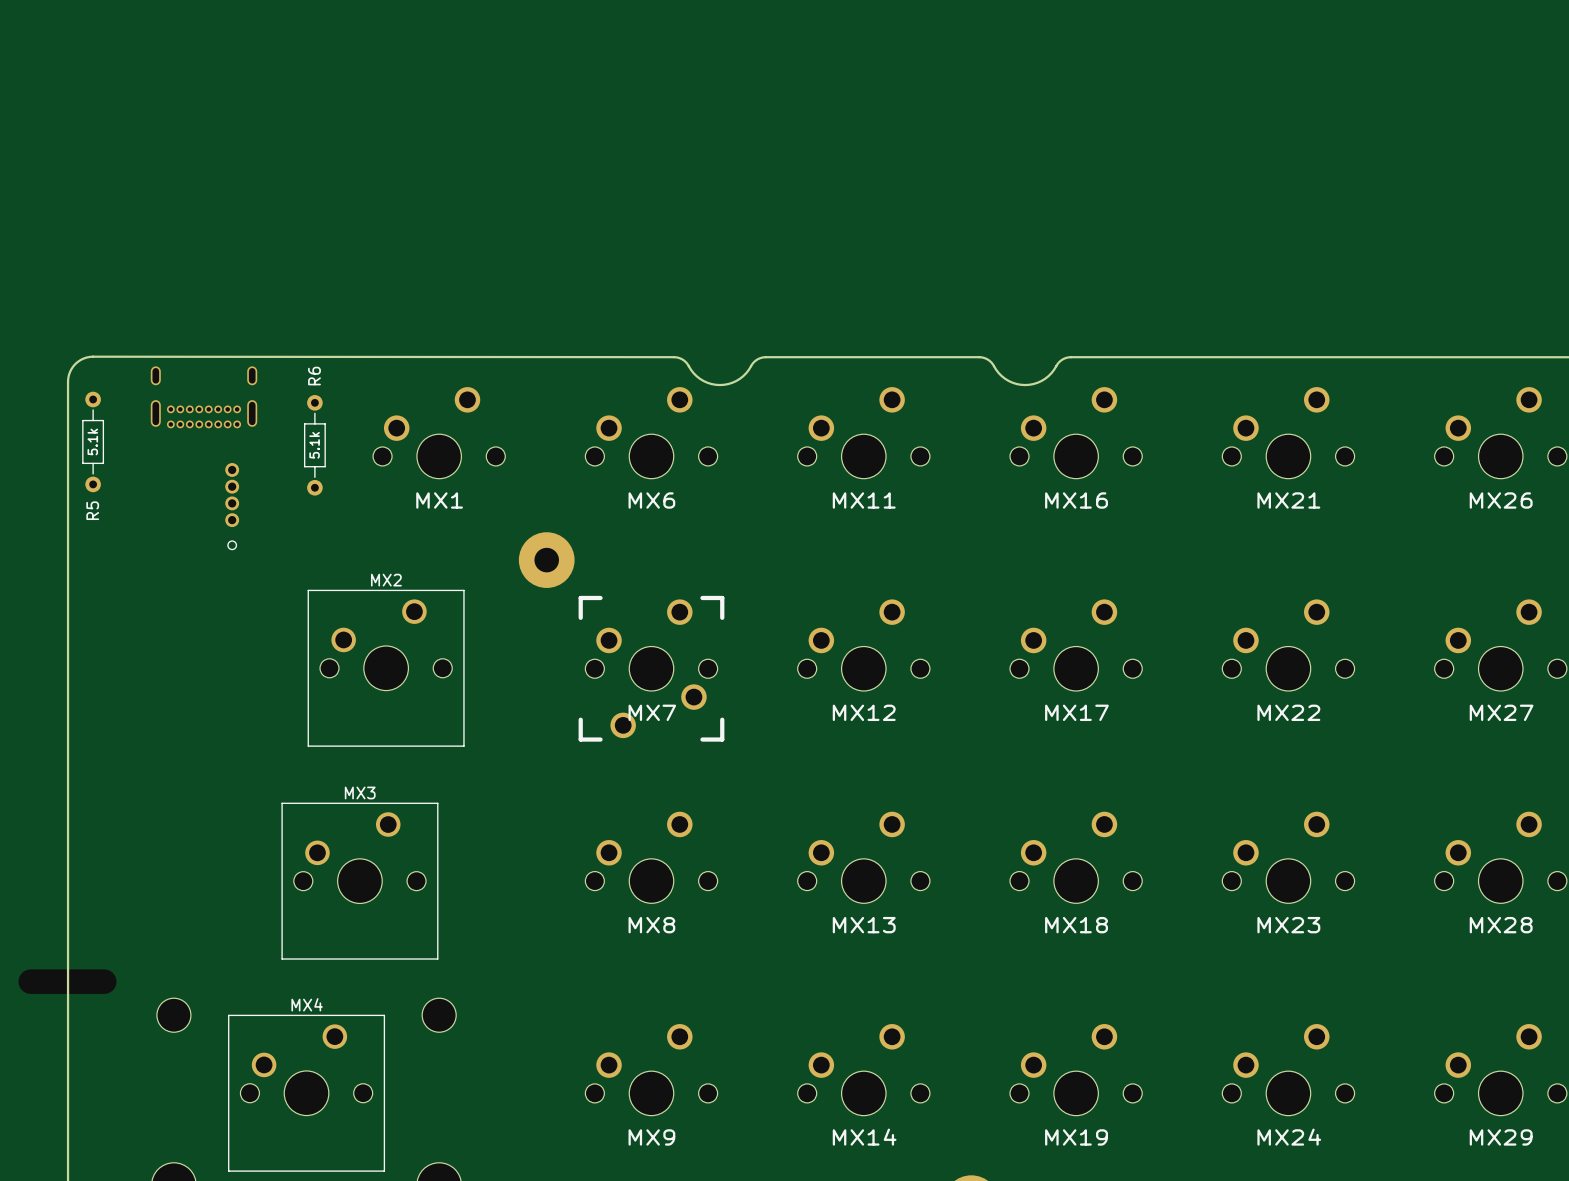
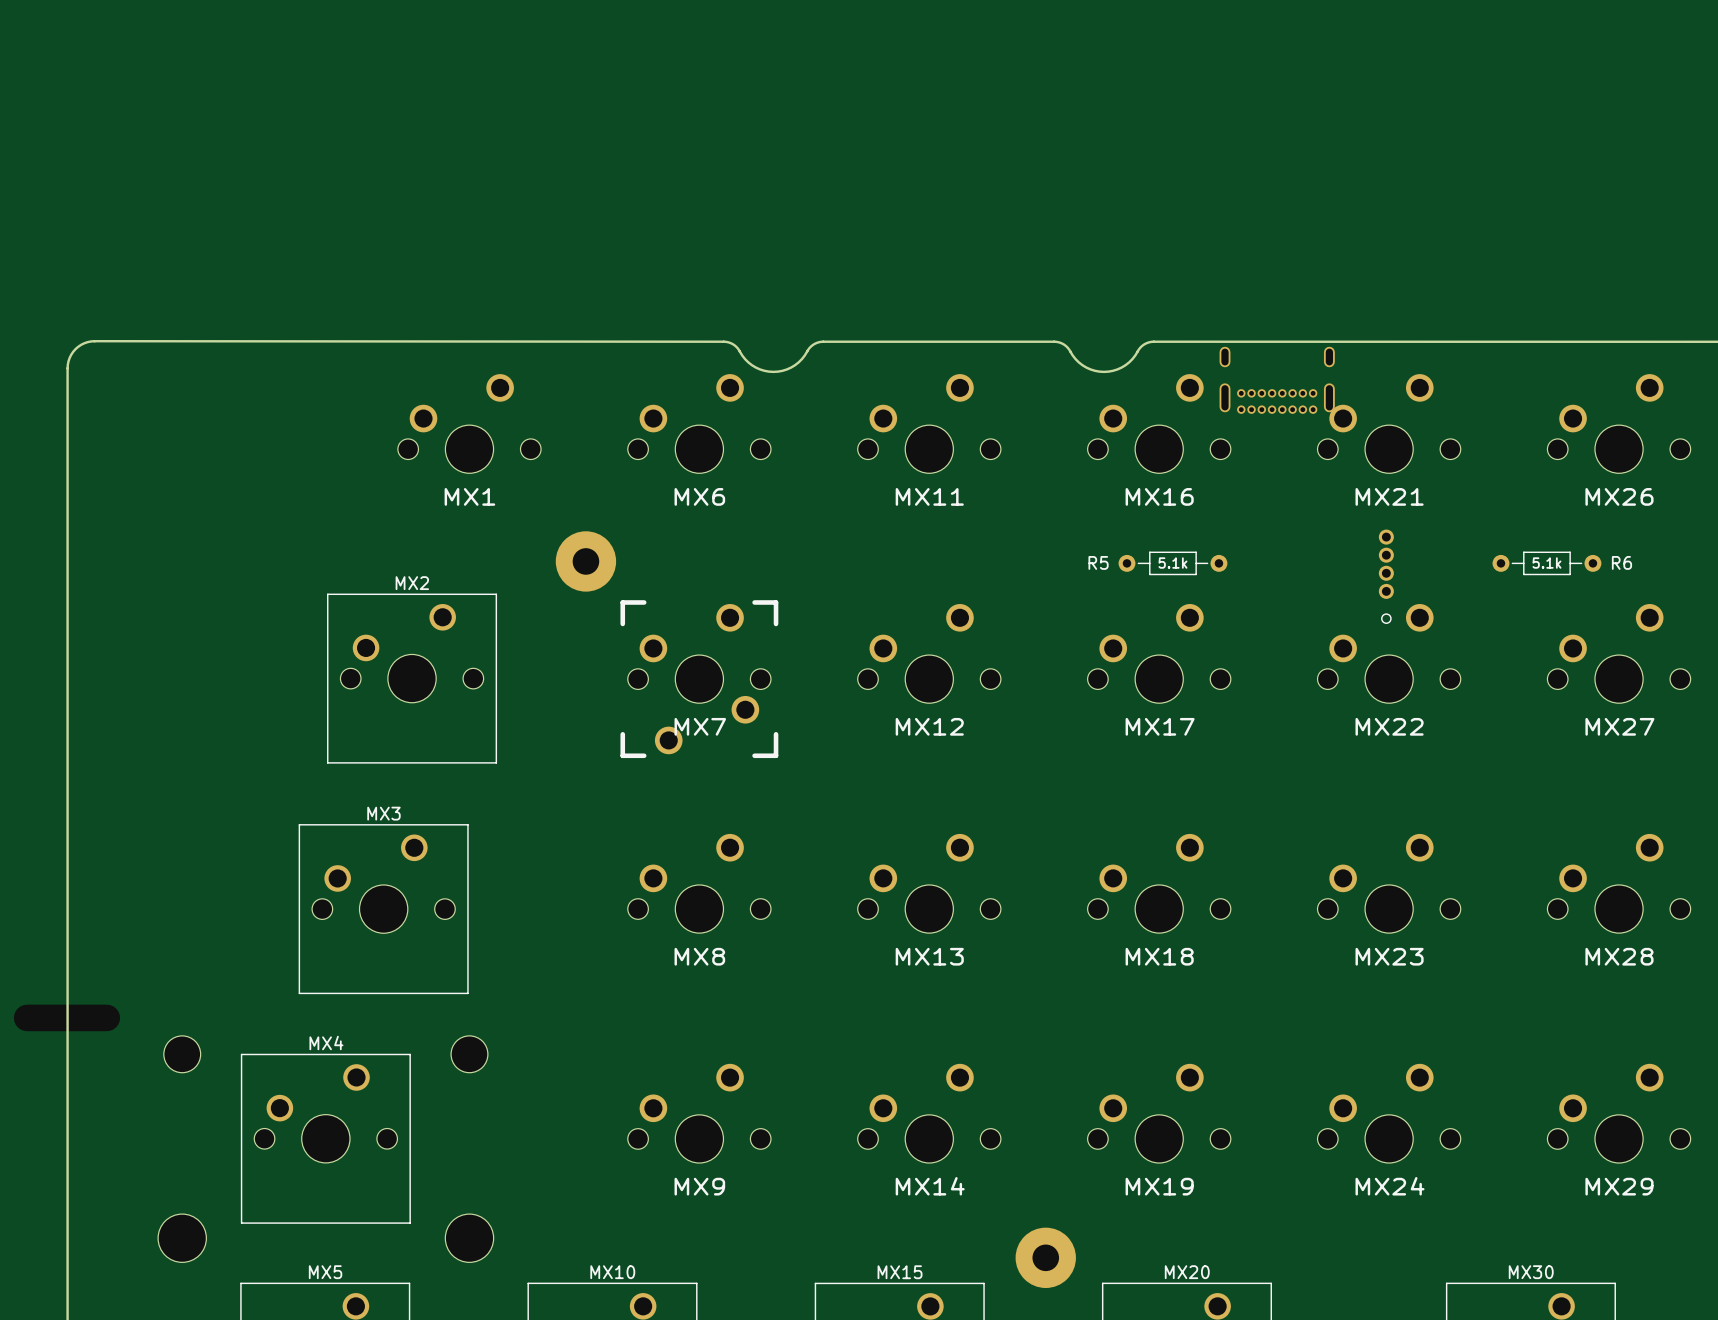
part: none -> (1277, 380)
part: (204, 397) -> none
R5 rotation: 0° (93, 441) -> 90° clockwise (1172, 563)
R5 position: (93, 441) -> (1172, 563)
R6 rotation: 0° (314, 445) -> 90° clockwise (1546, 563)
R6 position: (314, 445) -> (1546, 563)
part: (232, 506) -> none
part: none -> (1386, 576)

